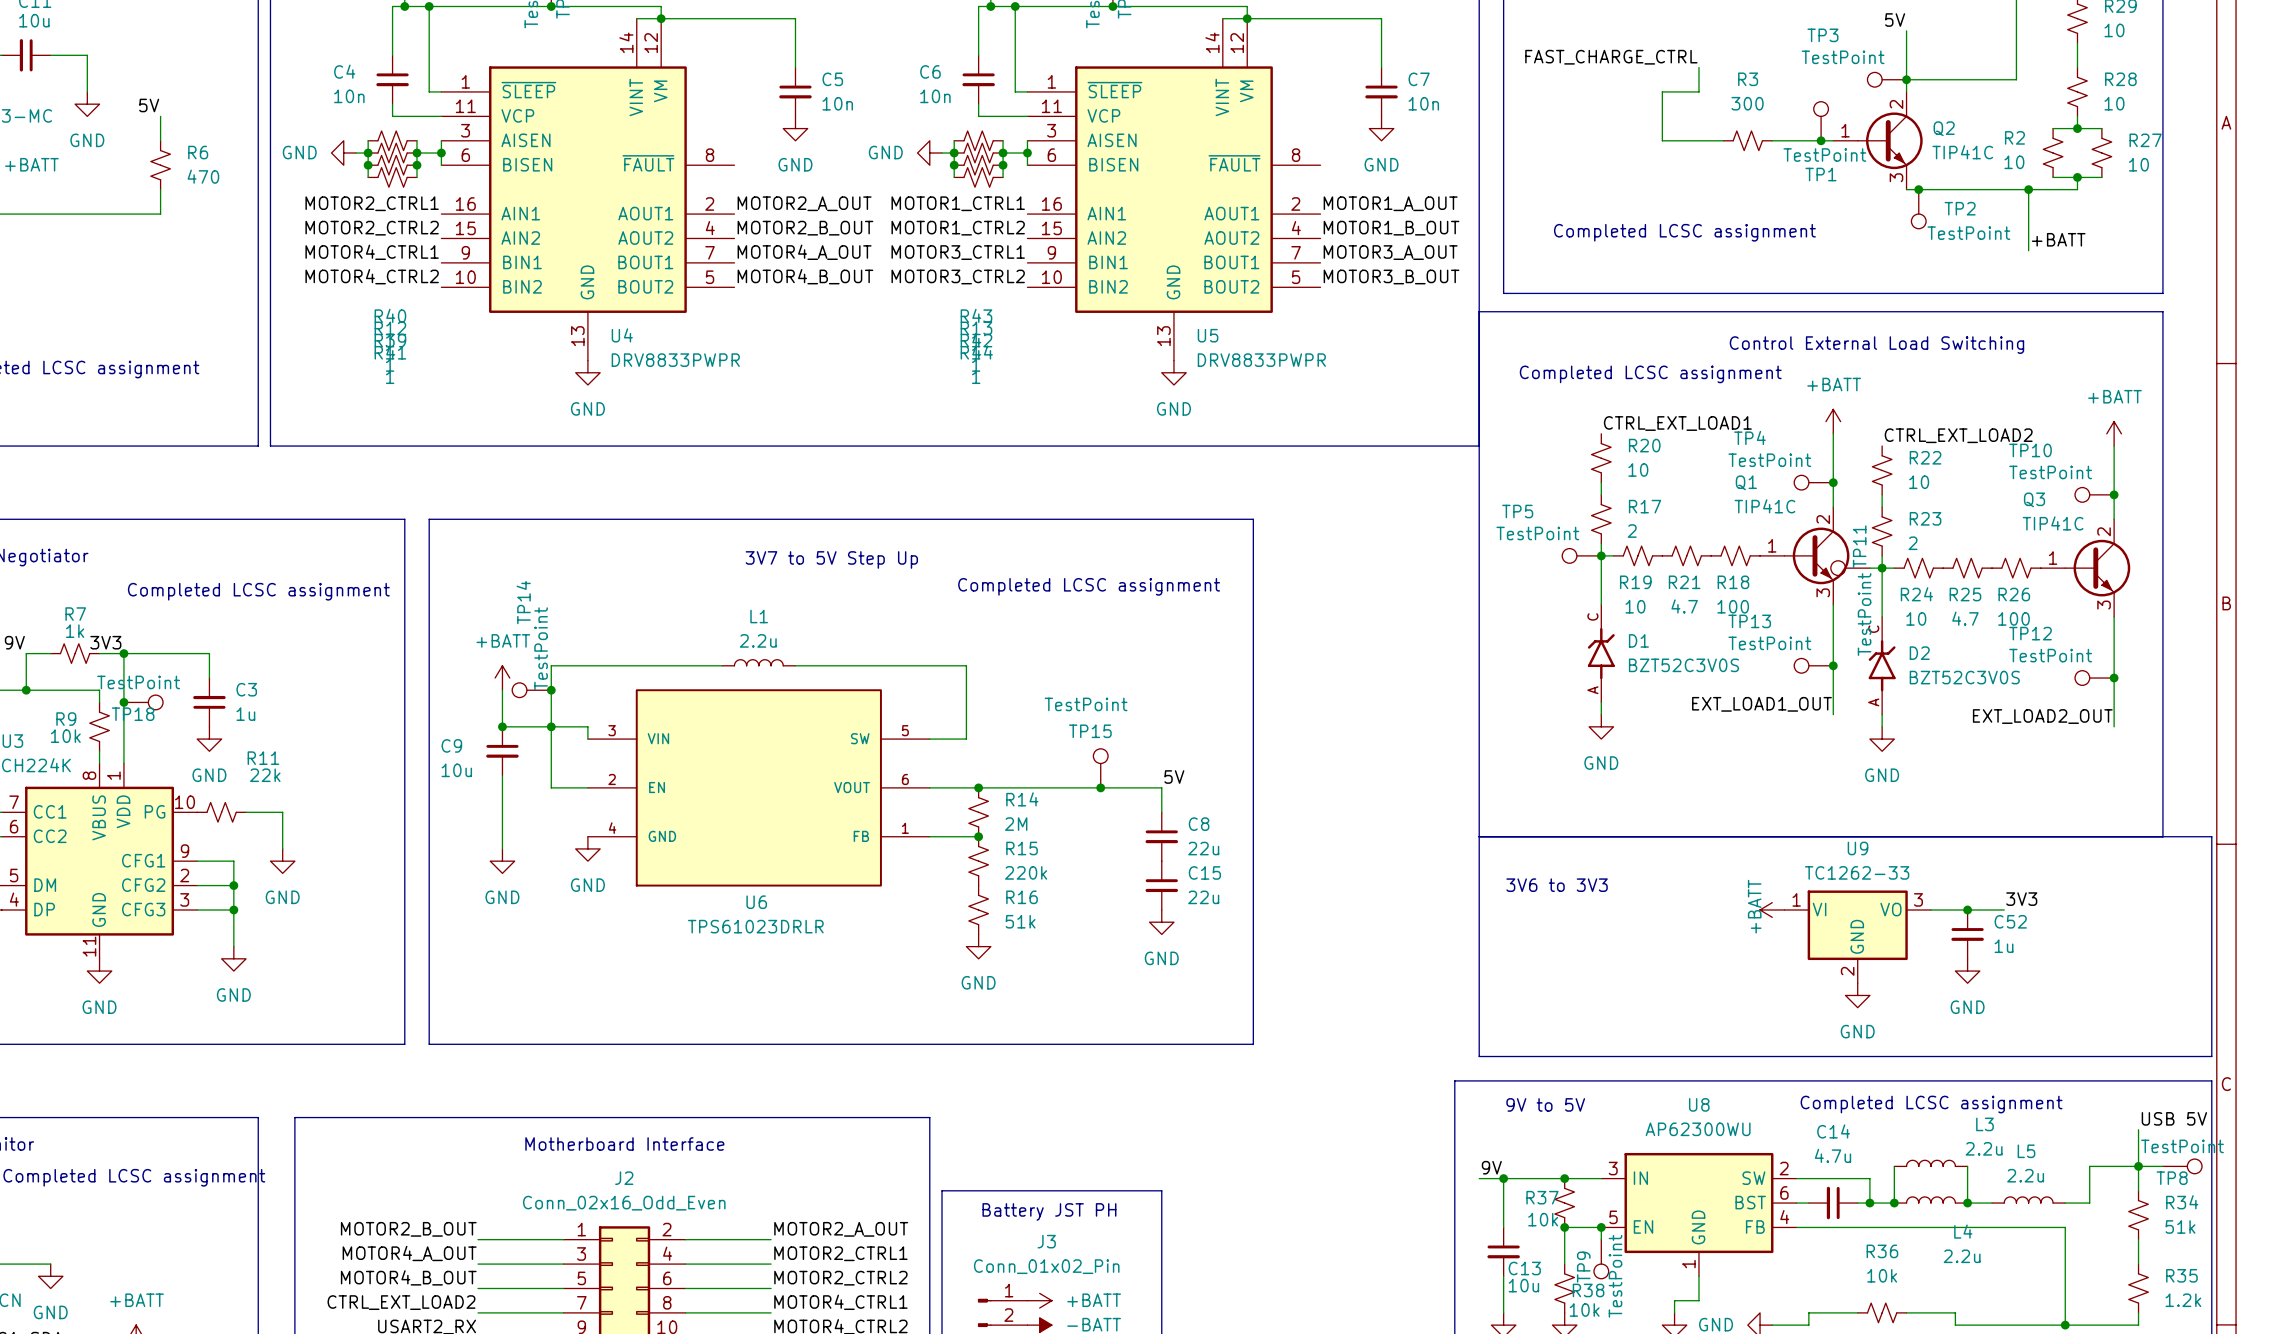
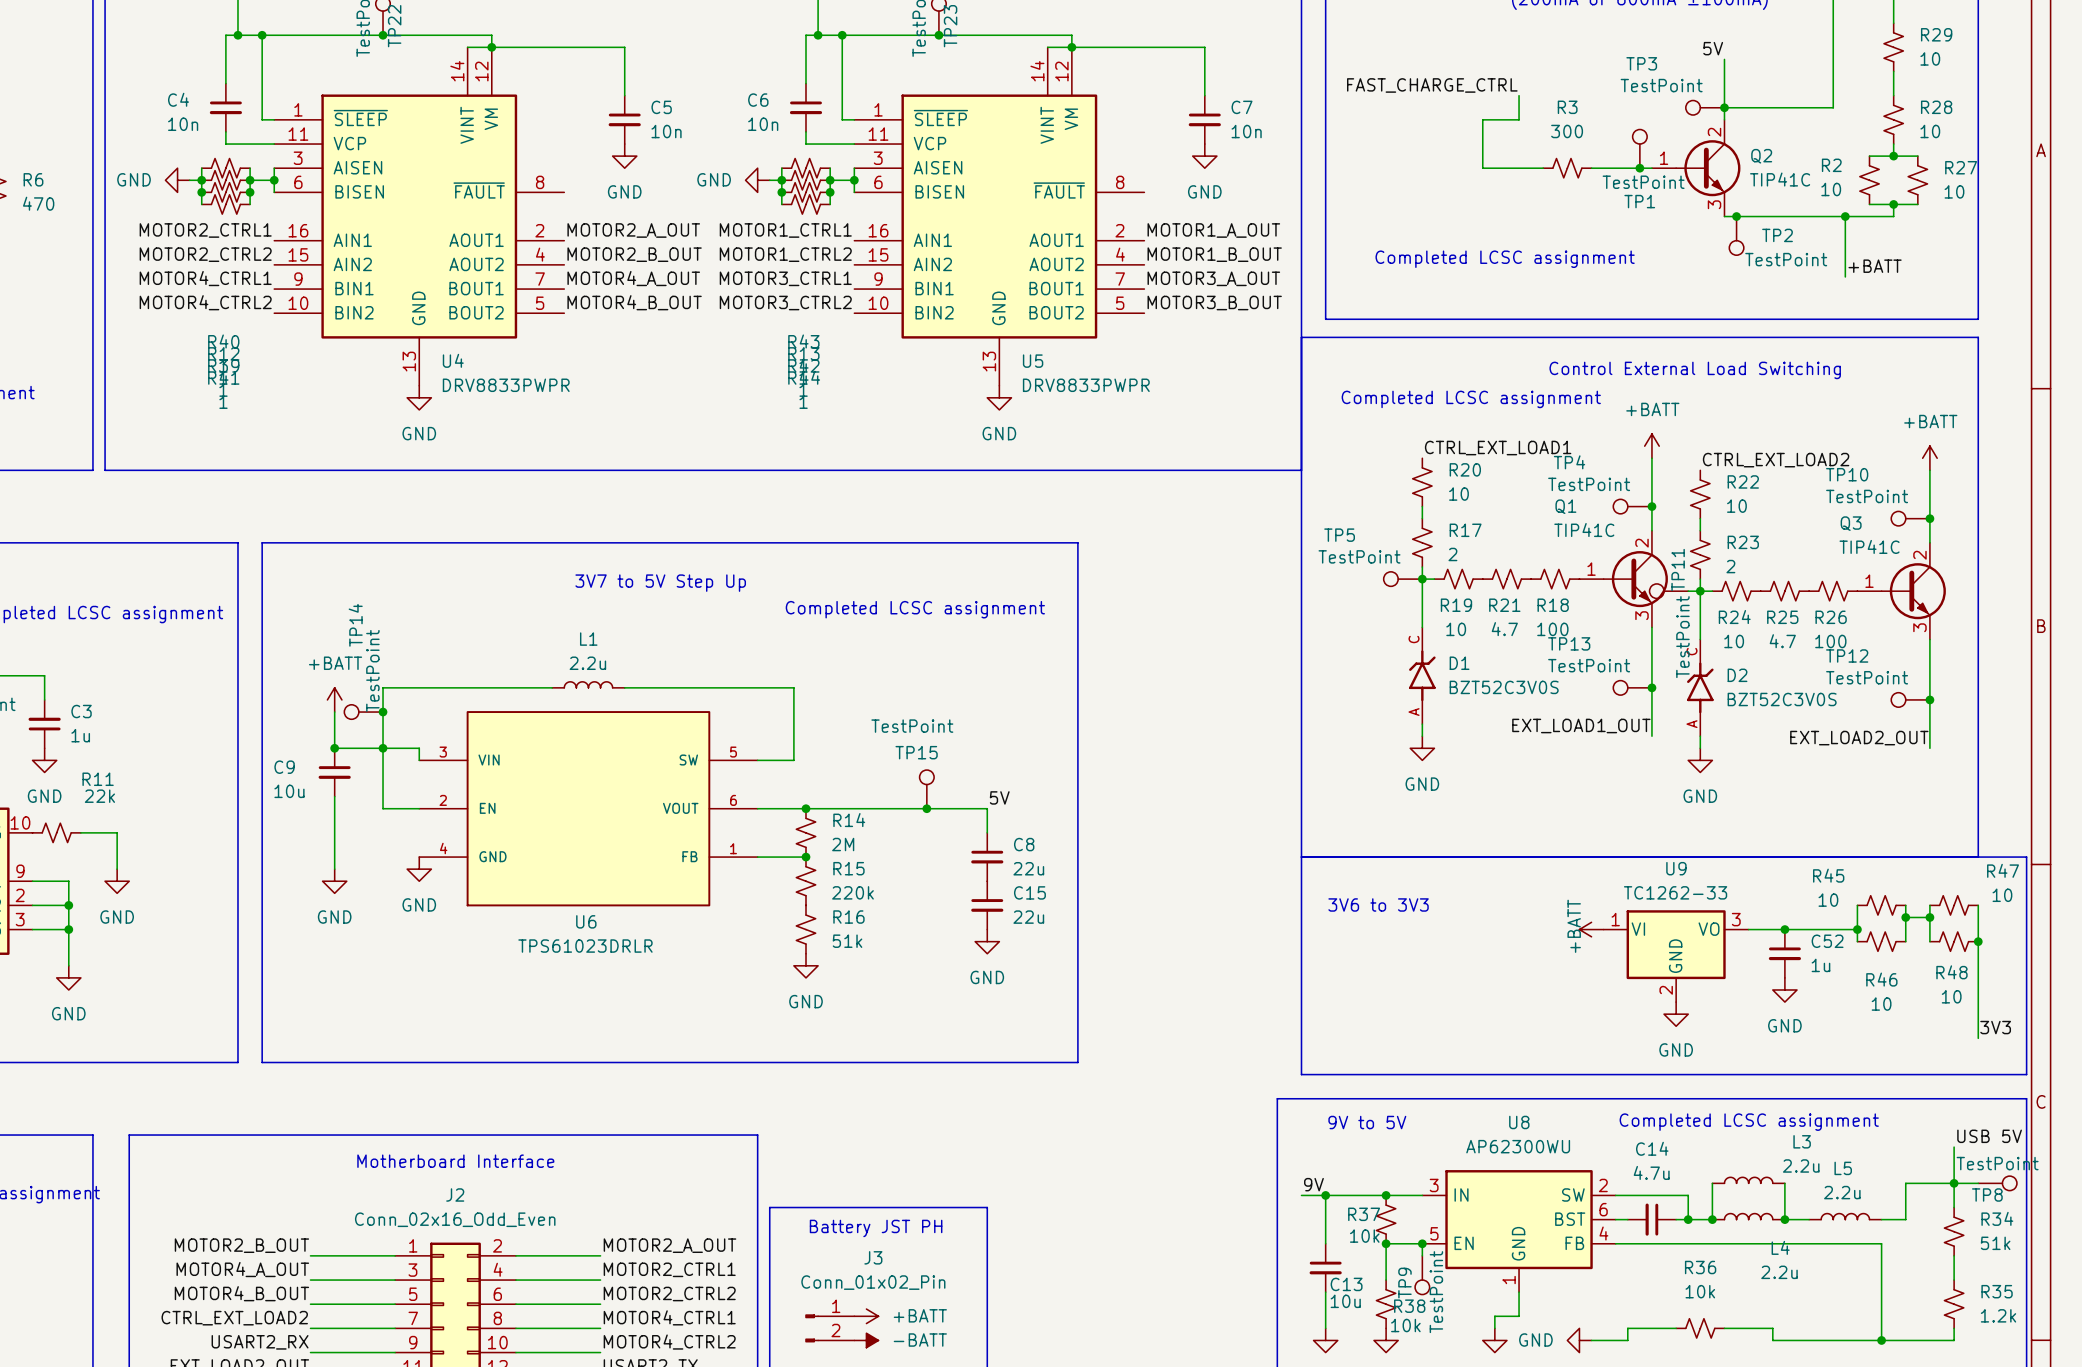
wire: none -> (1857, 905) (1857, 941)
R45: none -> 10 (1881, 905)
wire: none -> (1905, 905) (1905, 941)
wire: none -> (1929, 905) (1929, 941)
R47: none -> 10 (1954, 905)
wire: none -> (1978, 905) (1978, 1038)
wire: none -> (1905, 917) (1929, 917)
junction: none -> (1905, 917)
junction: none -> (1929, 917)
label position: 3V3 (2021, 899) -> 3V3 (1995, 1027)
wire: none -> (1821, 929) (1857, 929)
junction: none -> (1857, 929)
R46: none -> 10 (1881, 941)
R48: none -> 10 (1954, 941)
junction: none -> (1978, 941)

